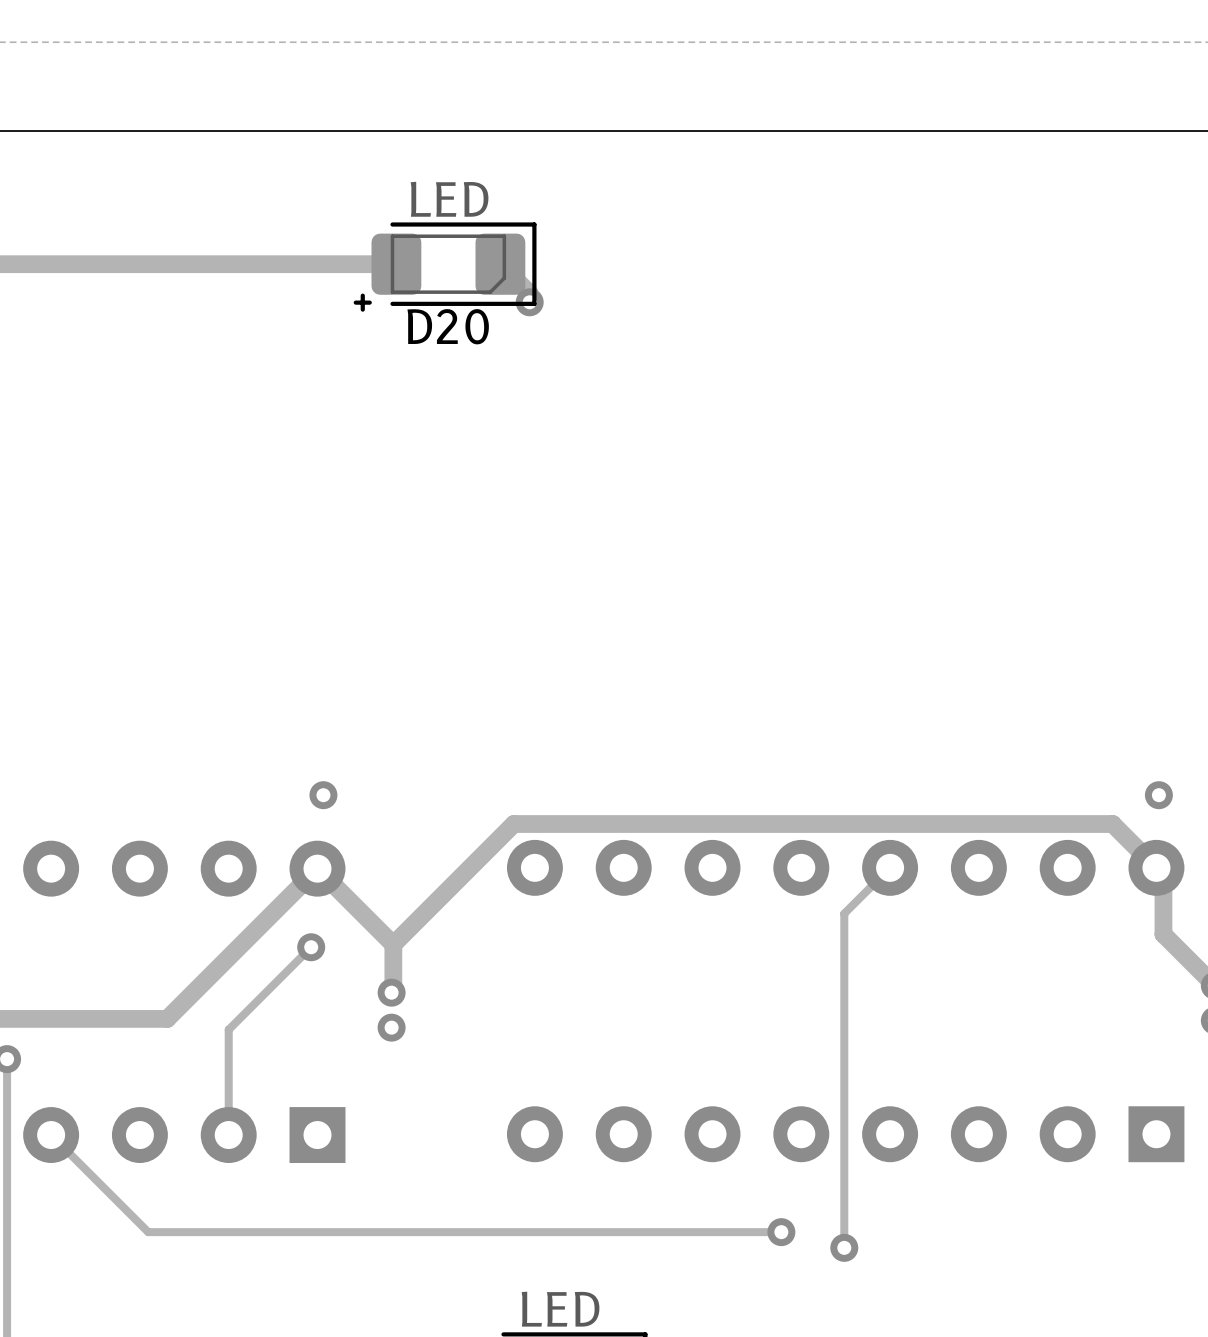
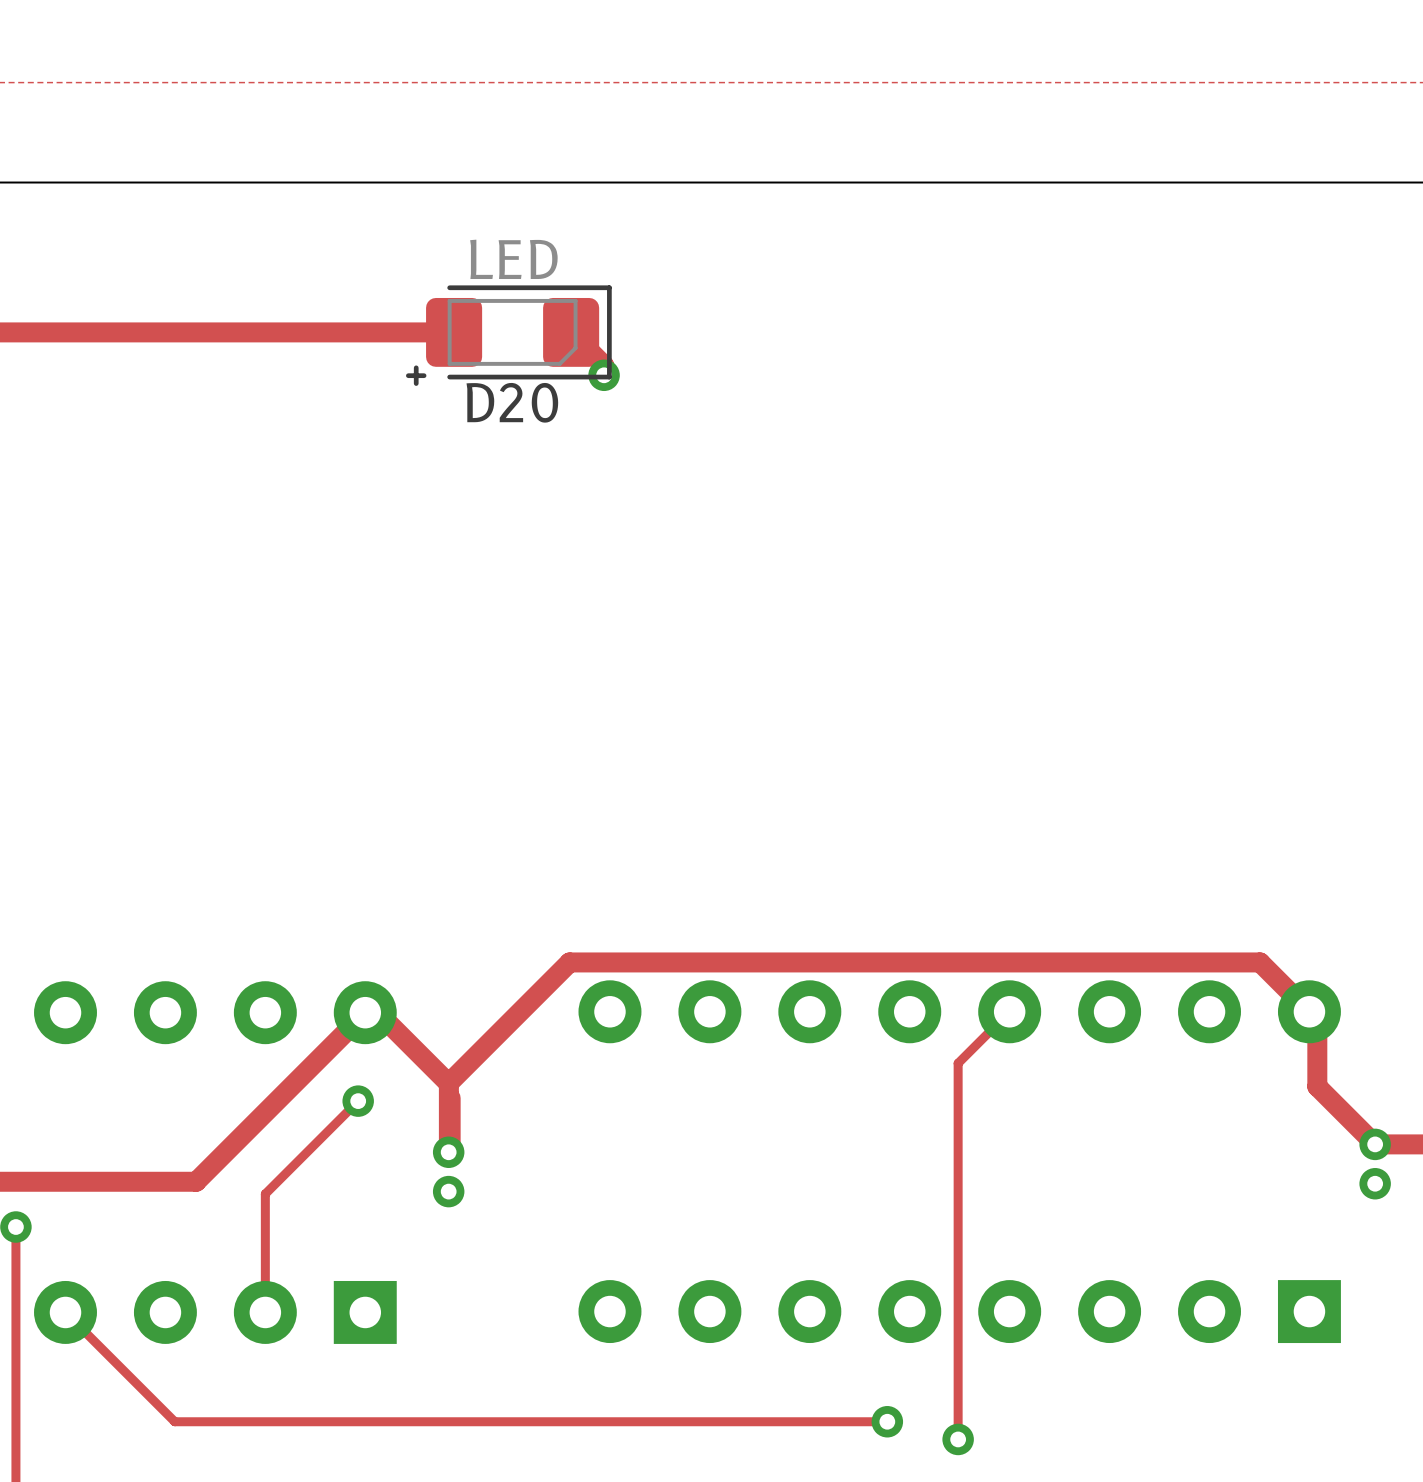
via: (323, 795) -> none
via: (1158, 795) -> none
track: (513, 824) (393, 944) (317, 868) -> (586, 962) (569, 962) (448, 1083) (448, 1148)
track: none -> (365, 1012) (377, 1012) (448, 1083)

